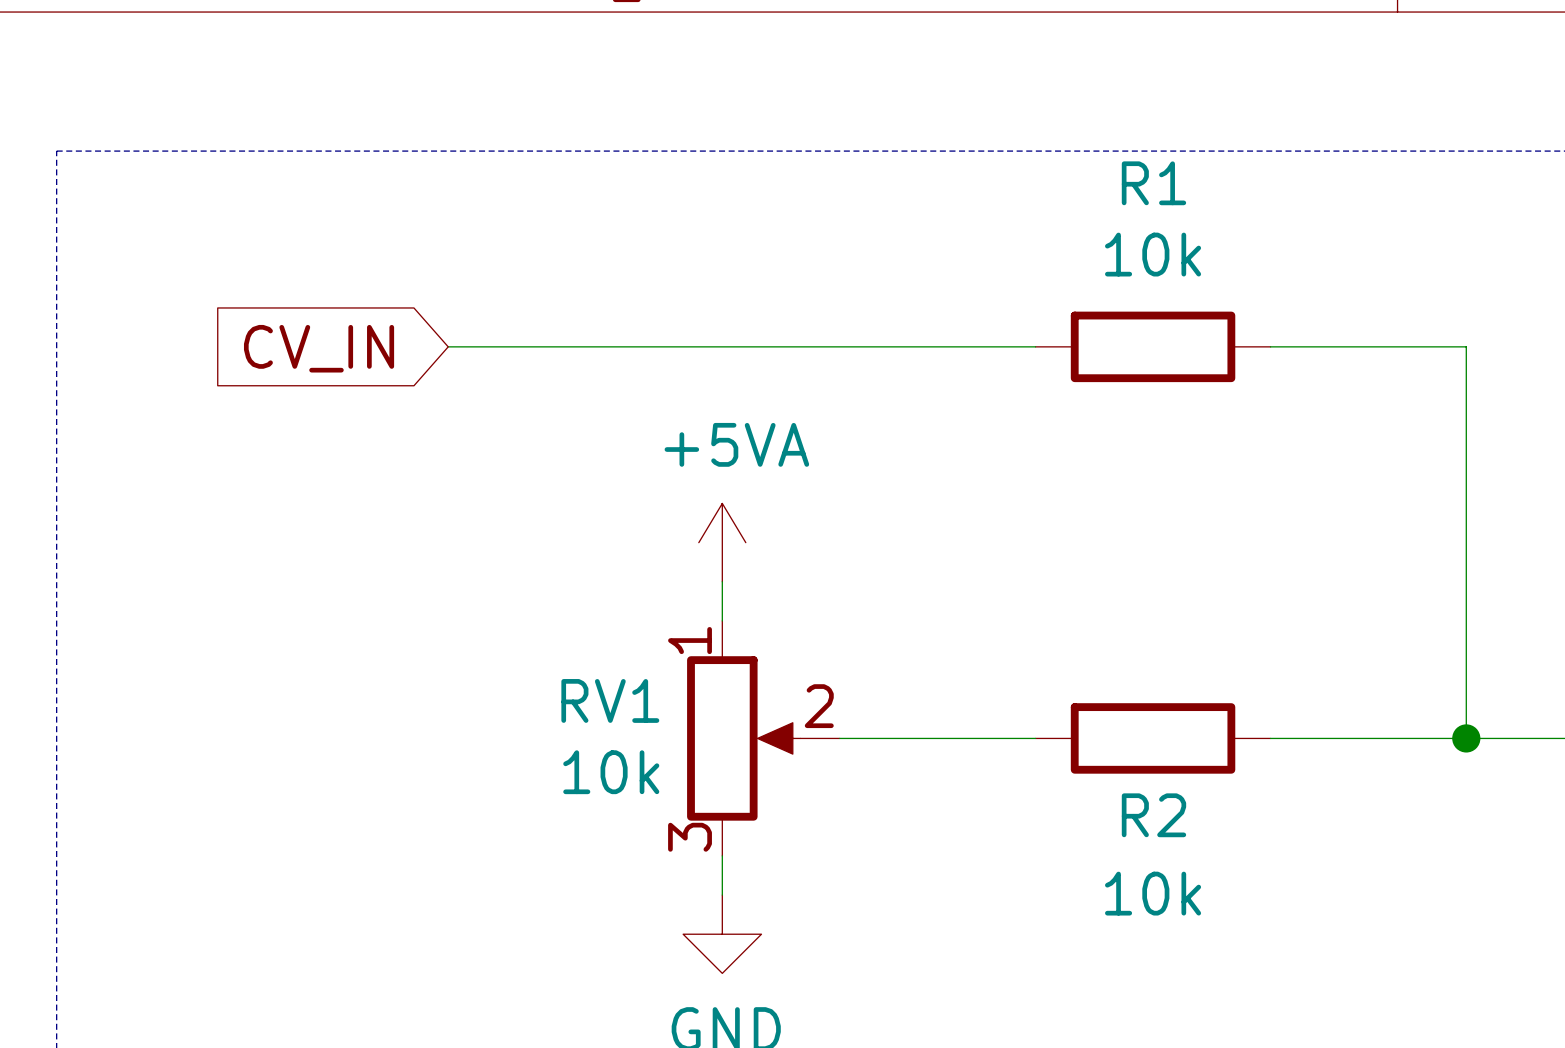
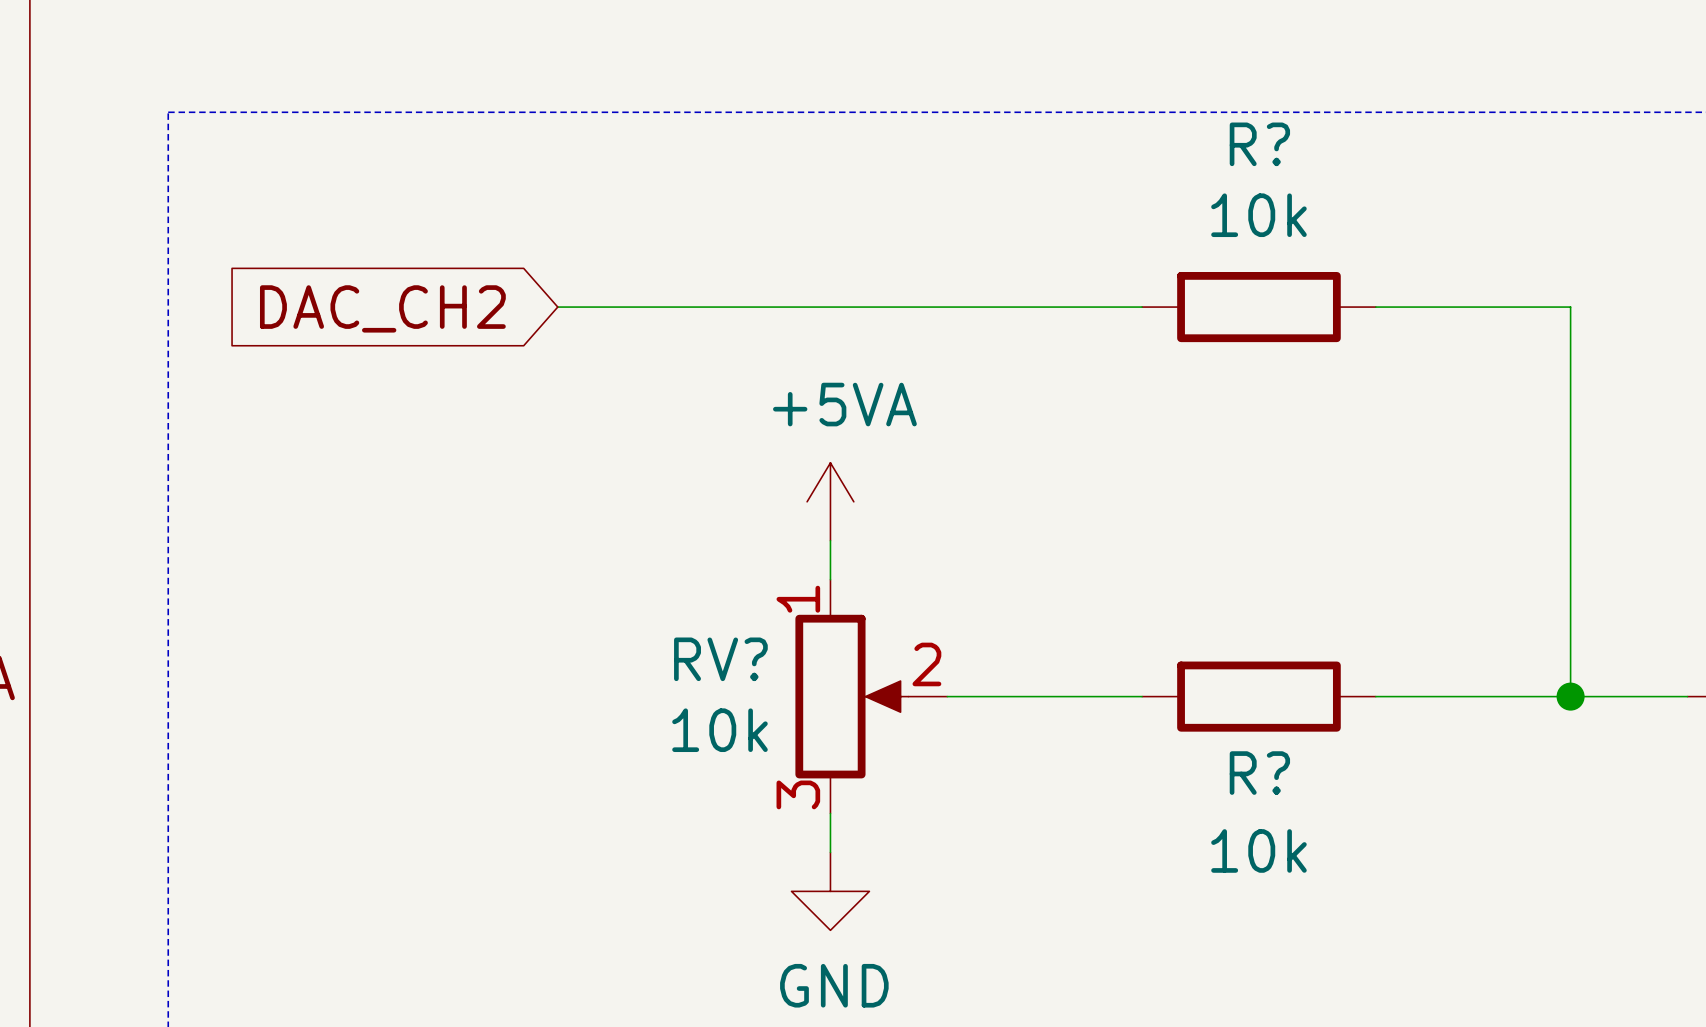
R1 name: R1 (1153, 183) -> R? (1259, 144)
global label: CV_IN (319, 348) -> DAC_CH2 (382, 308)
RV1 name: RV1 (610, 700) -> RV? (720, 659)
R2 name: R2 (1153, 815) -> R? (1259, 773)

